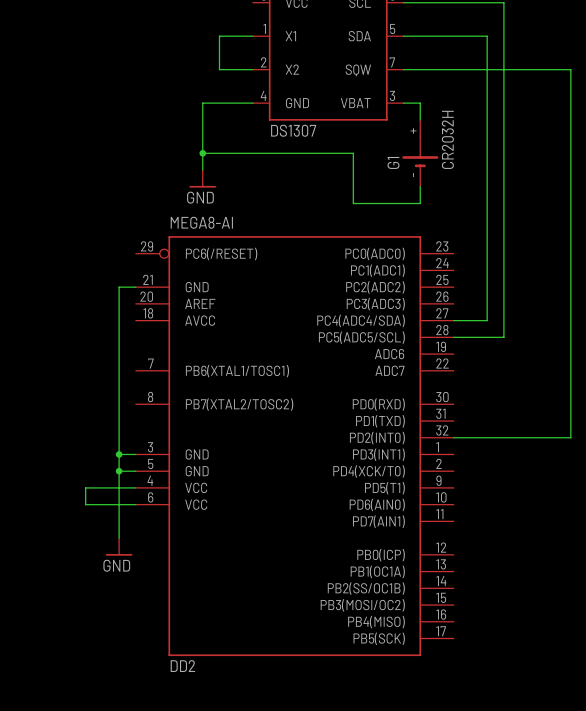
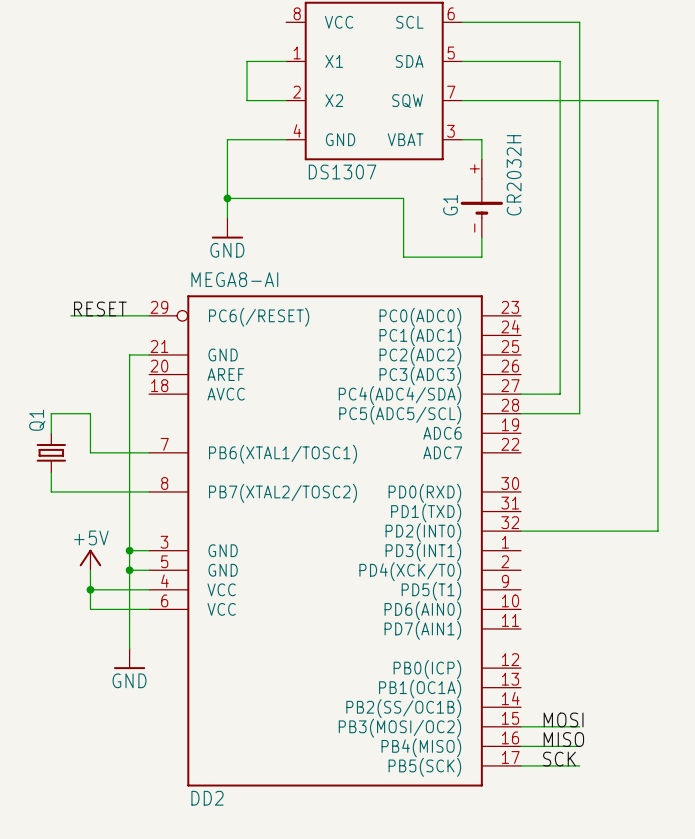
label: none -> RESET (100, 309)
wire: none -> (70, 315) (149, 315)
wire: none -> (51, 433) (51, 413) (90, 413) (90, 452) (149, 452)
Q1: none -> (51, 452)
wire: none -> (51, 472) (51, 491) (149, 491)
power symbol: none -> +5V (90, 559)
wire: none -> (90, 570) (90, 589)
junction: none -> (90, 589)
label: none -> MOSI (563, 719)
wire: none -> (520, 726) (579, 726)
label: none -> MISO (563, 739)
wire: none -> (520, 746) (579, 746)
label: none -> SCK (559, 759)
wire: none -> (520, 765) (579, 765)

